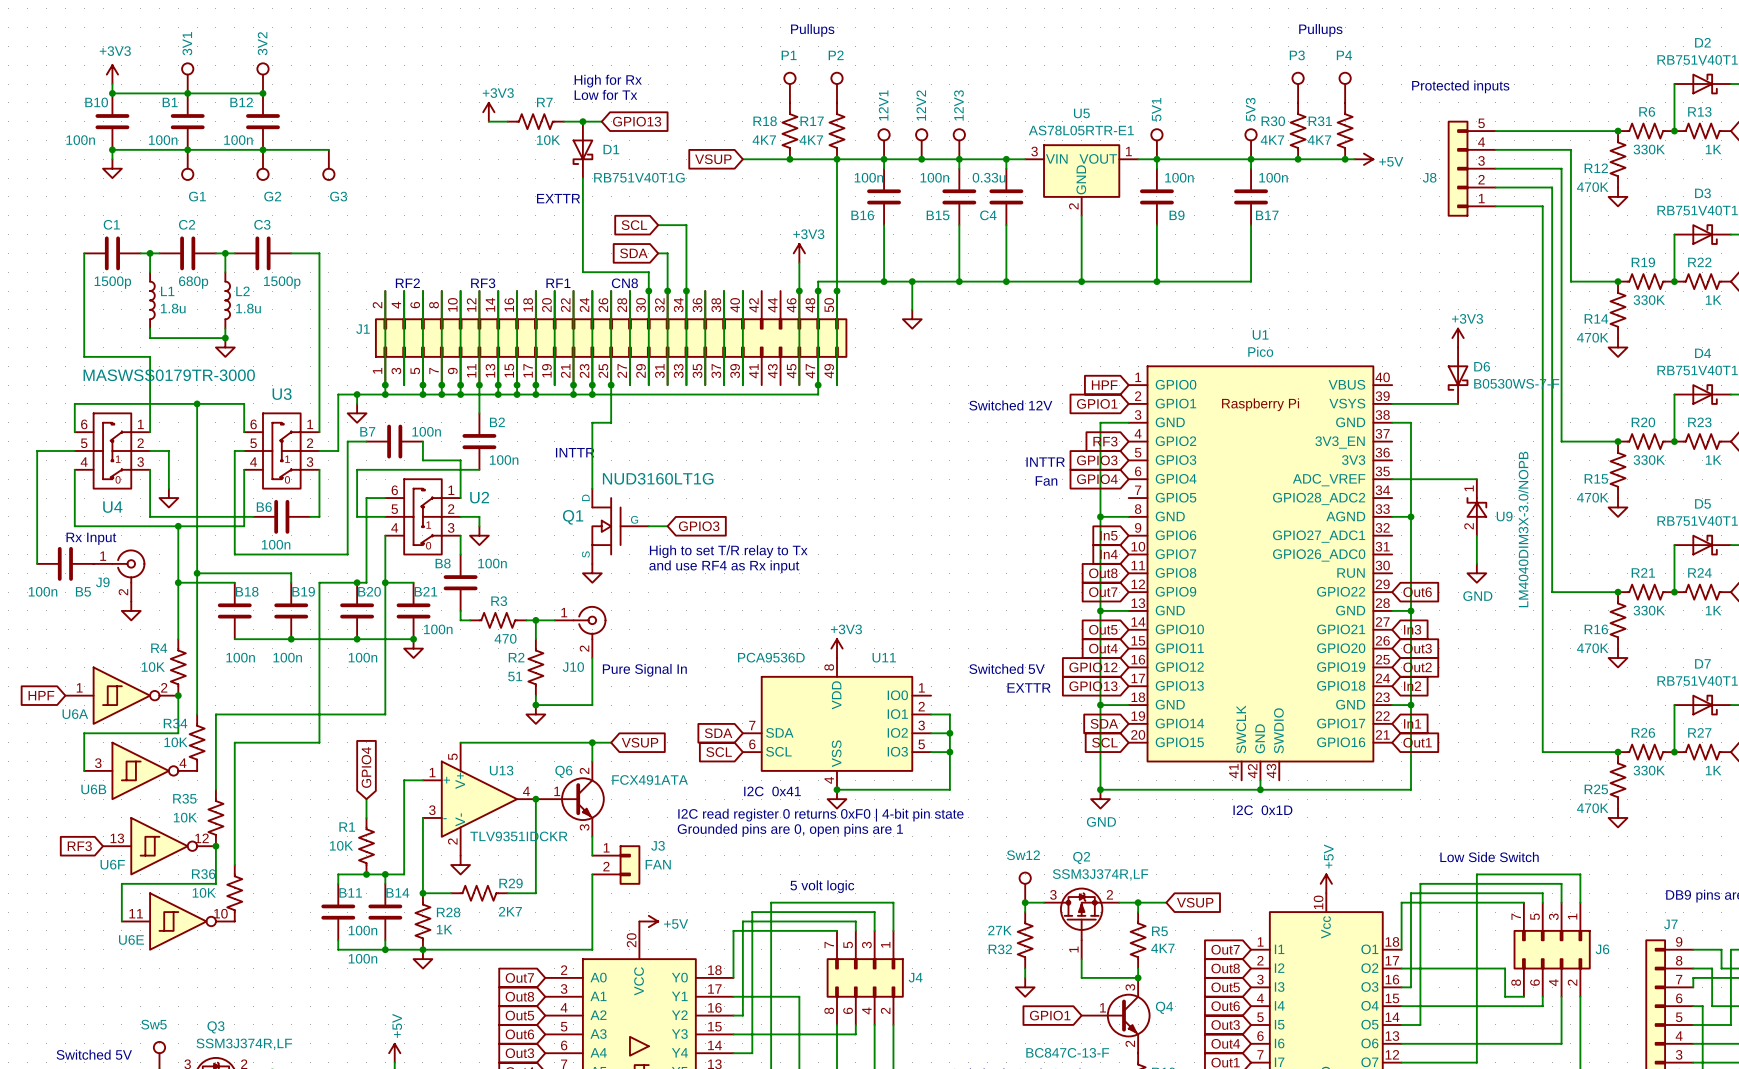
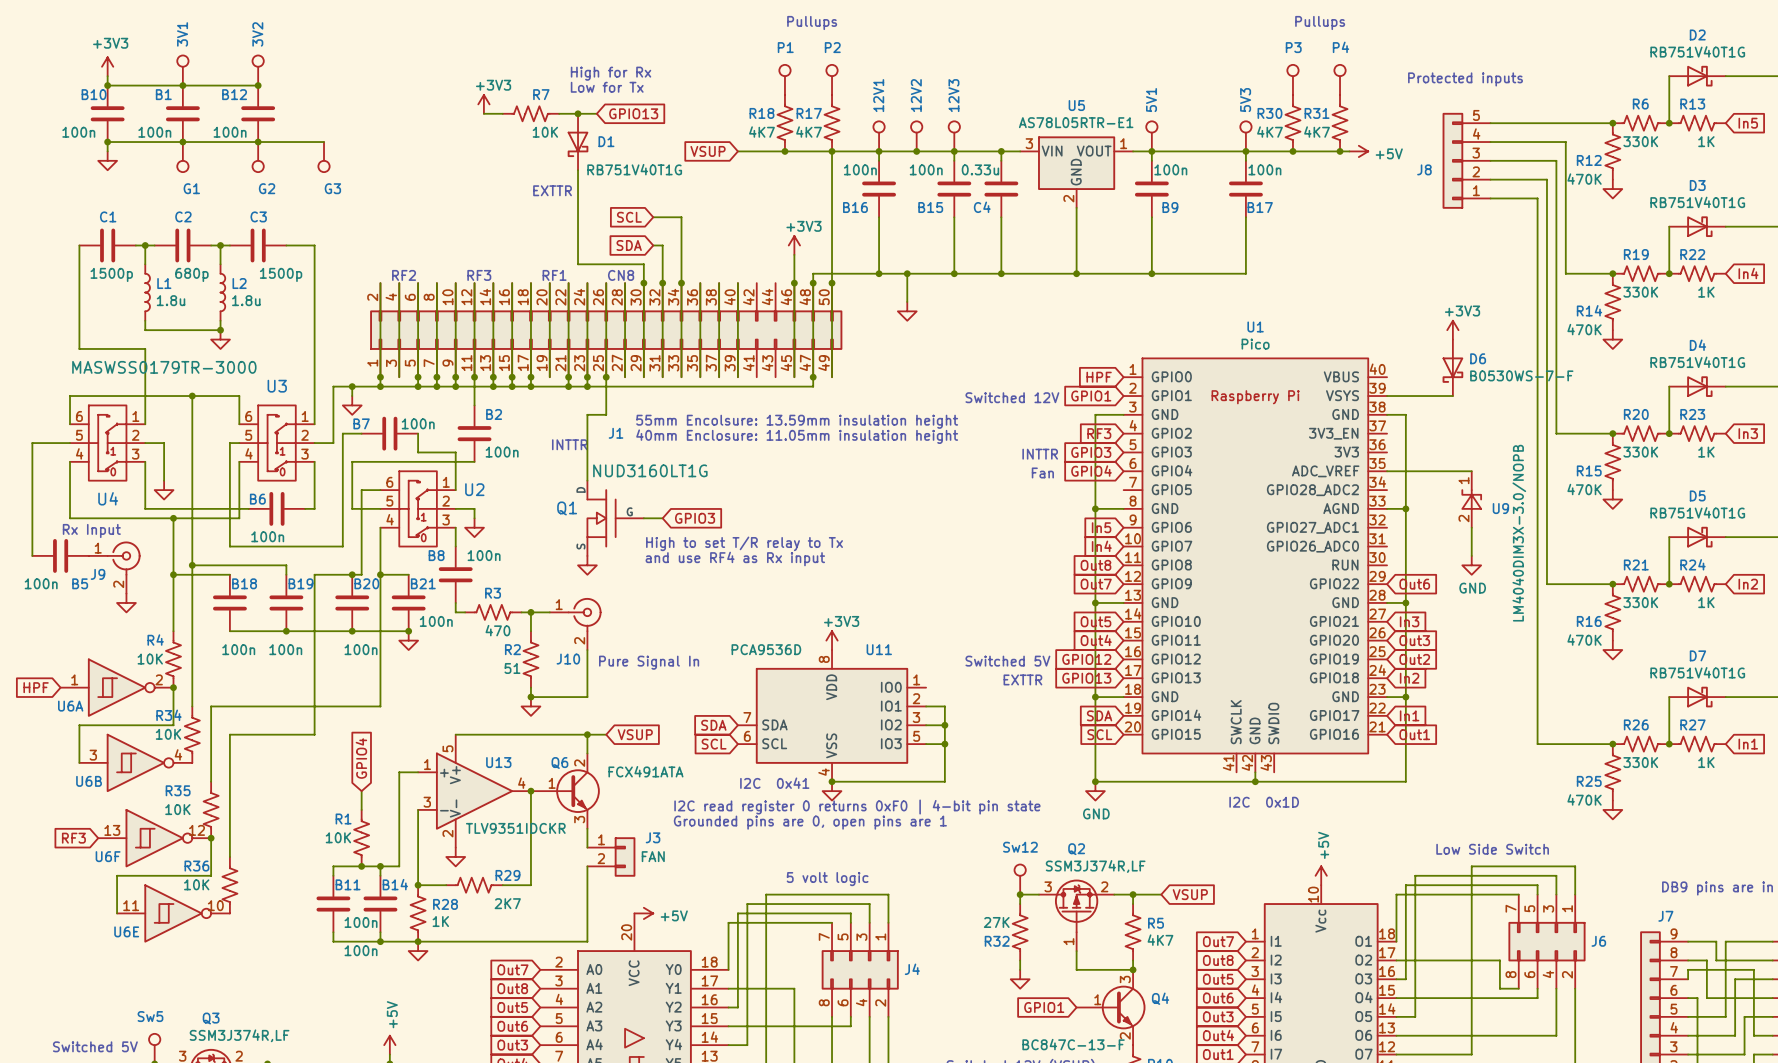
J1 name position: J1 (363, 329) -> J1 (616, 433)
text: none -> 55mm Encolsure: 13.59mm insulation height (797, 421)
text: none -> 40mm Enclosure: 11.05mm insulation height (797, 436)

